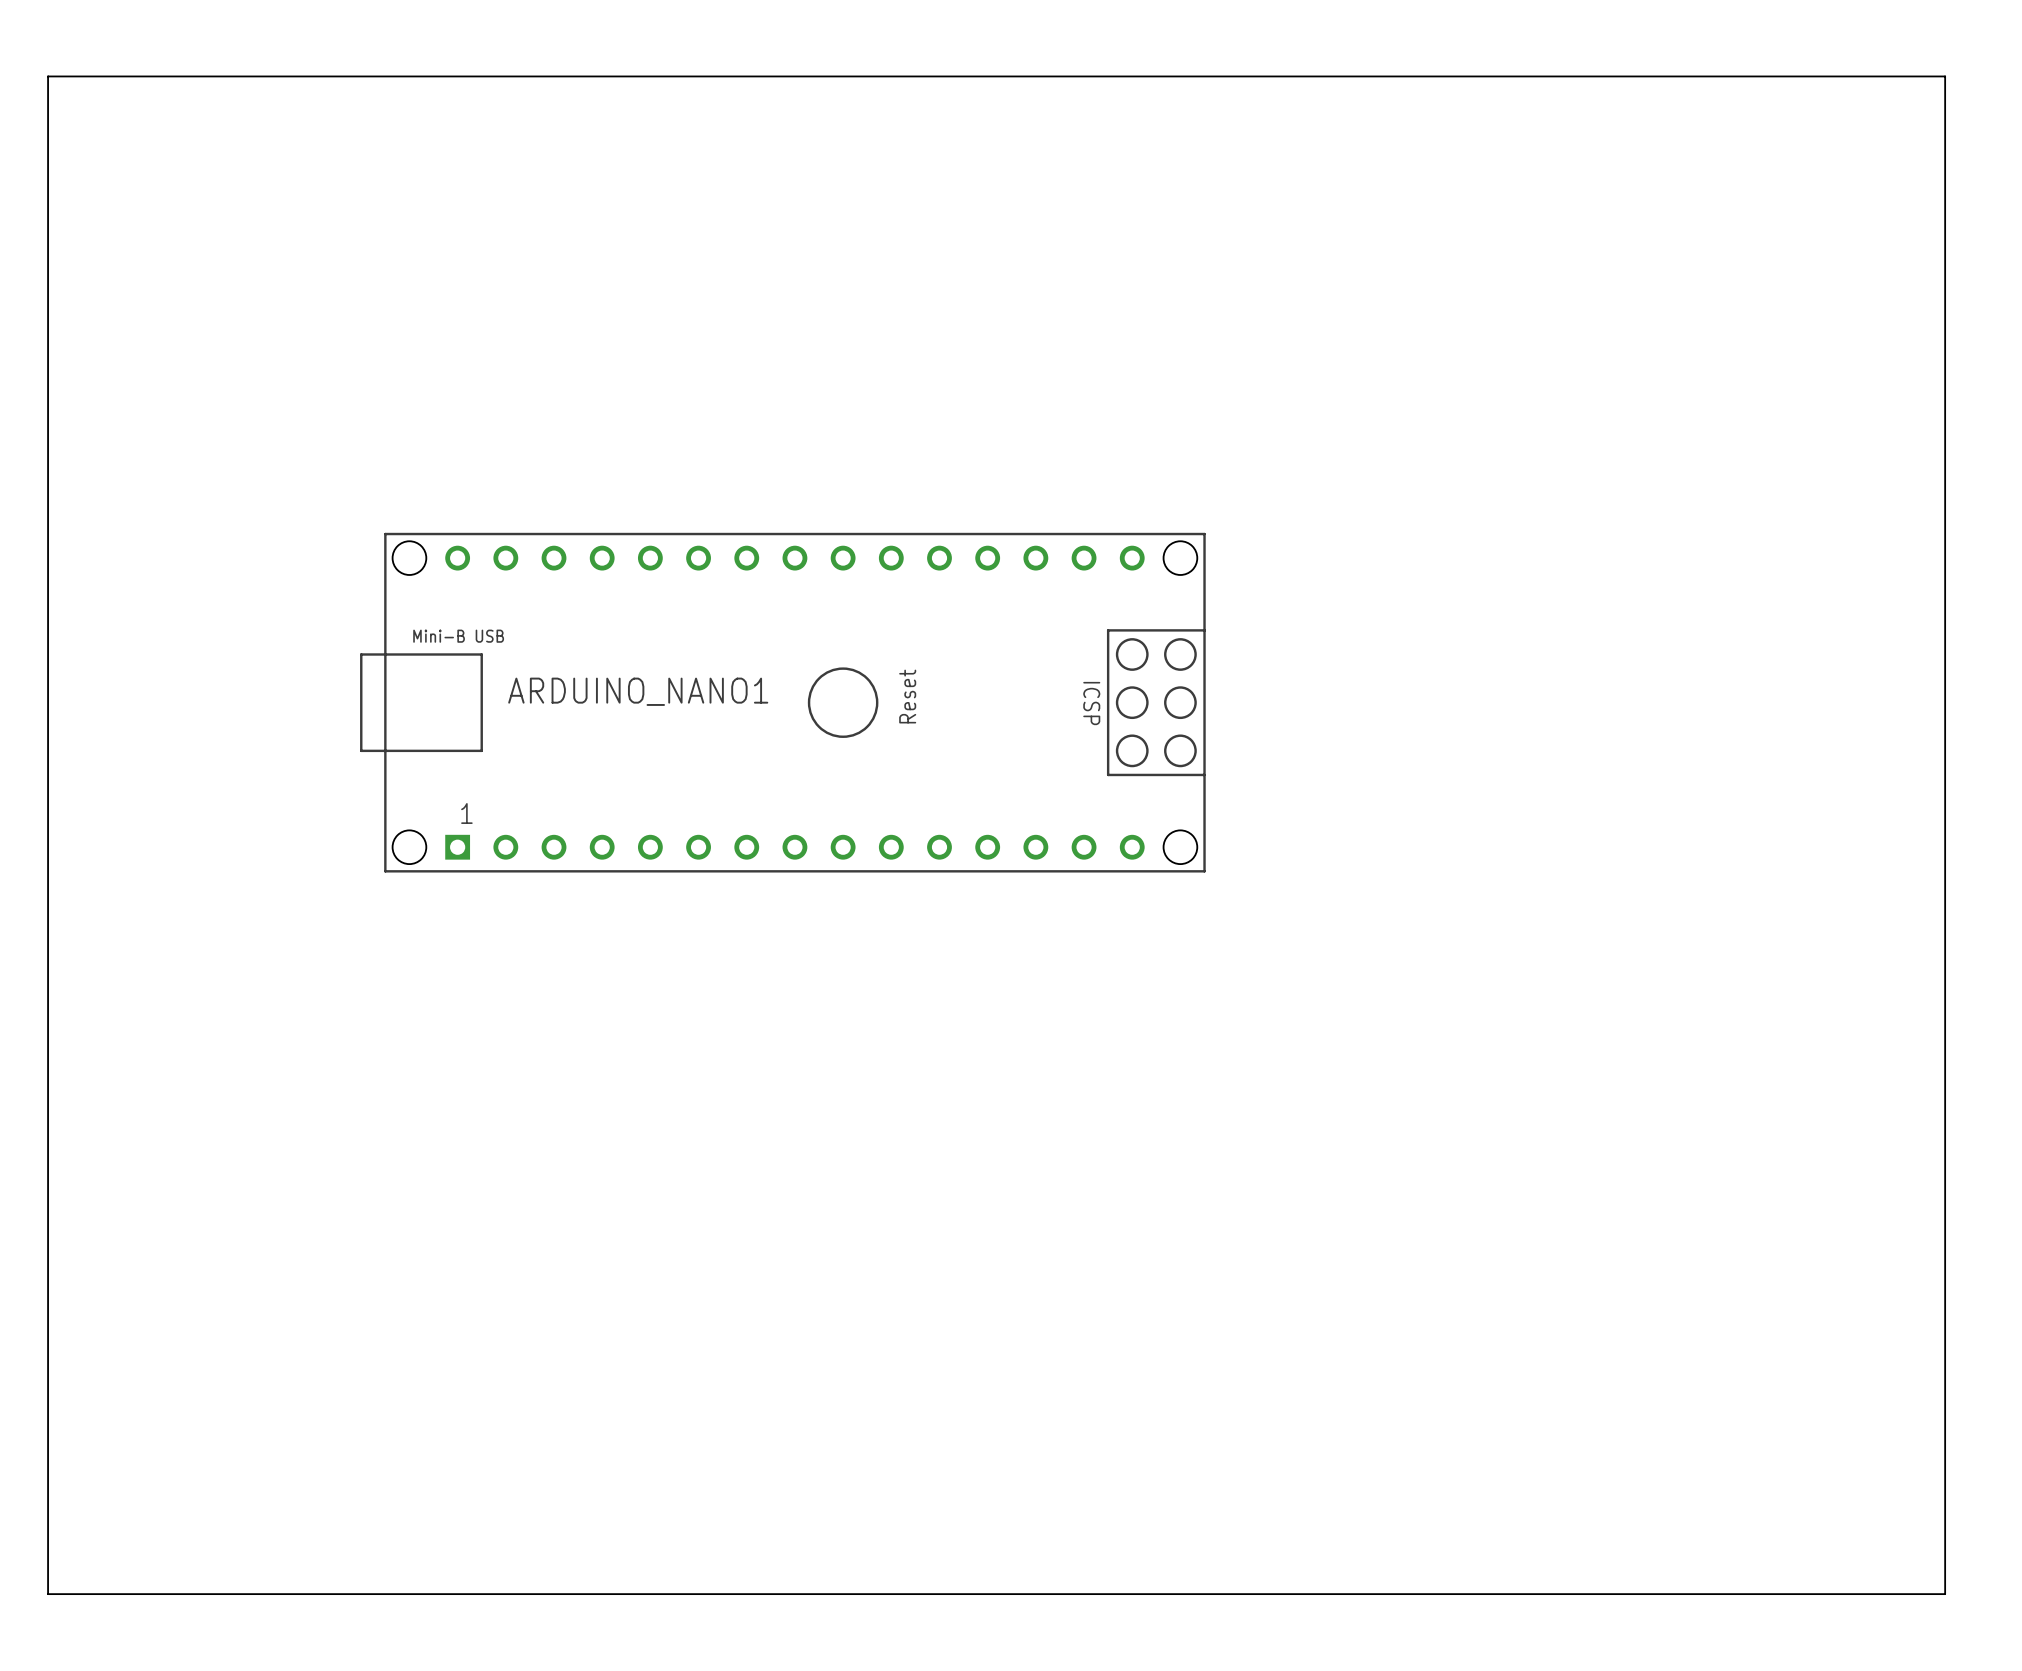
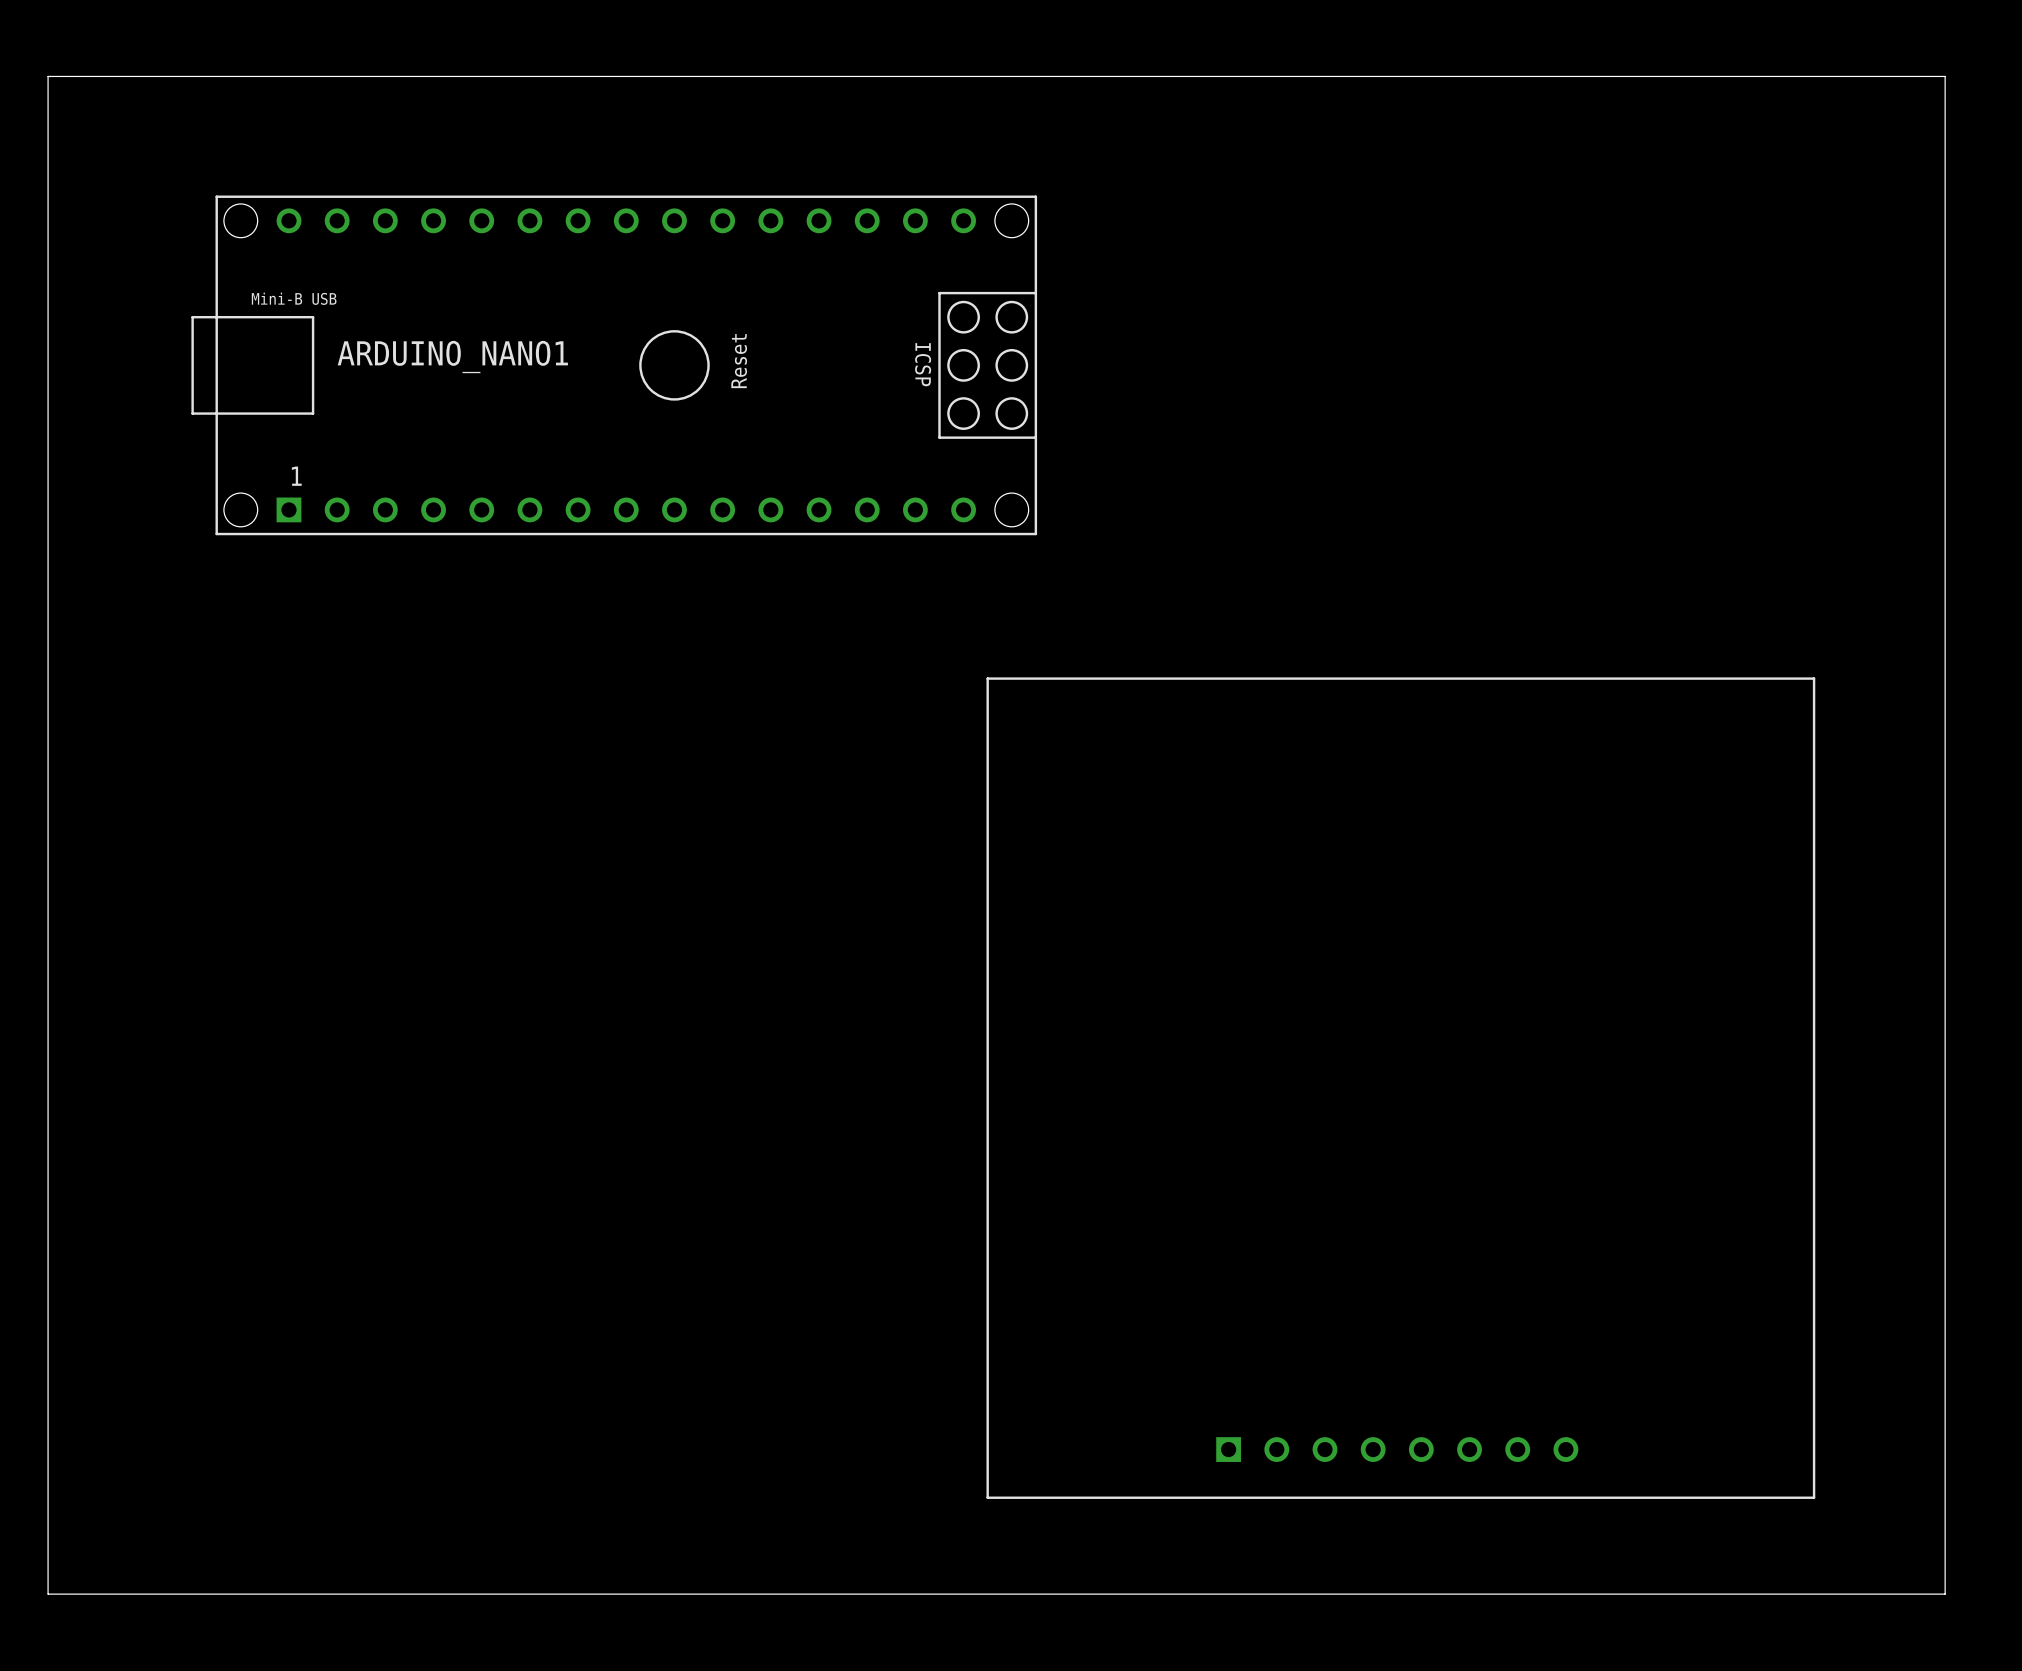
ARDUINO_NANO1 position: (782, 702) -> (614, 365)
part: none -> (1400, 1088)

